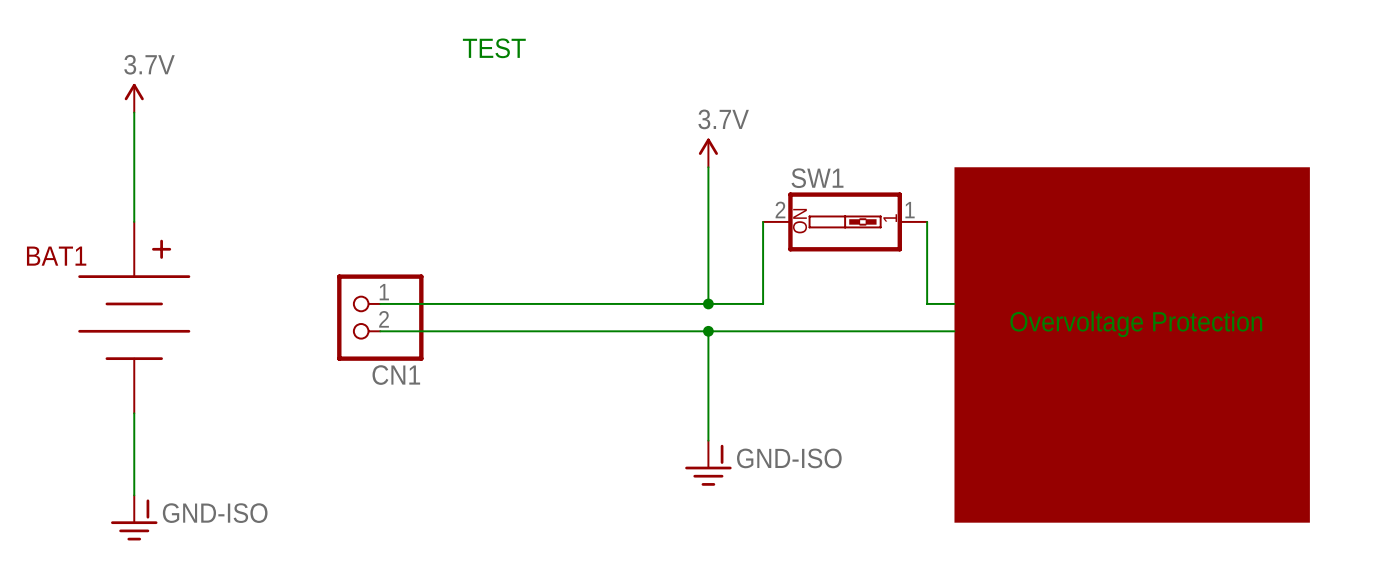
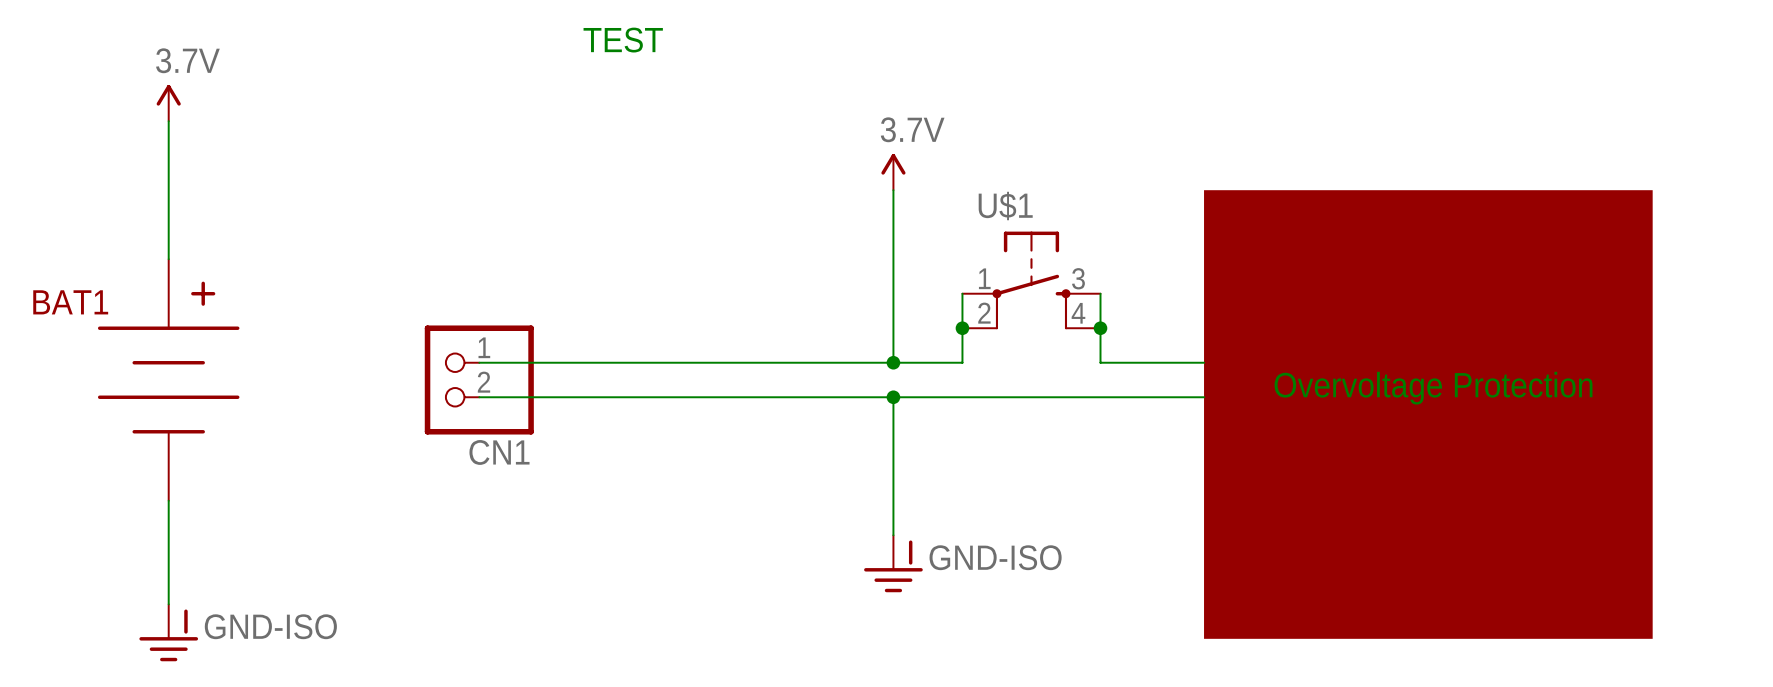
wire: (763, 221) (763, 249) -> none
SW1: (845, 221) -> none
wire: (927, 221) (927, 303) -> (1100, 293) (1100, 362) (1169, 362)
U$1: none -> (1031, 280)
junction: none -> (962, 328)
junction: none -> (1100, 328)

